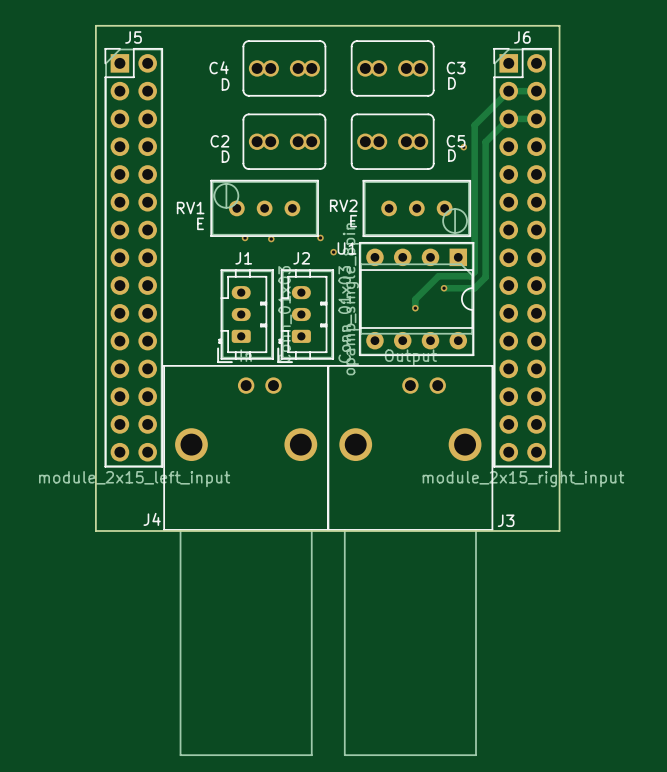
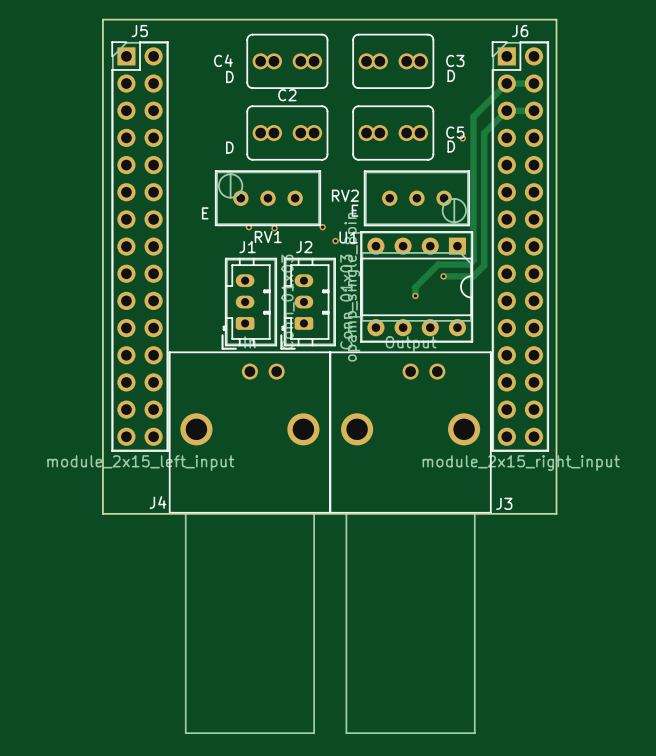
C2 name position: C2 (219, 141) -> C2 (287, 95)
RV1 name position: RV1 (190, 208) -> RV1 (268, 237)

